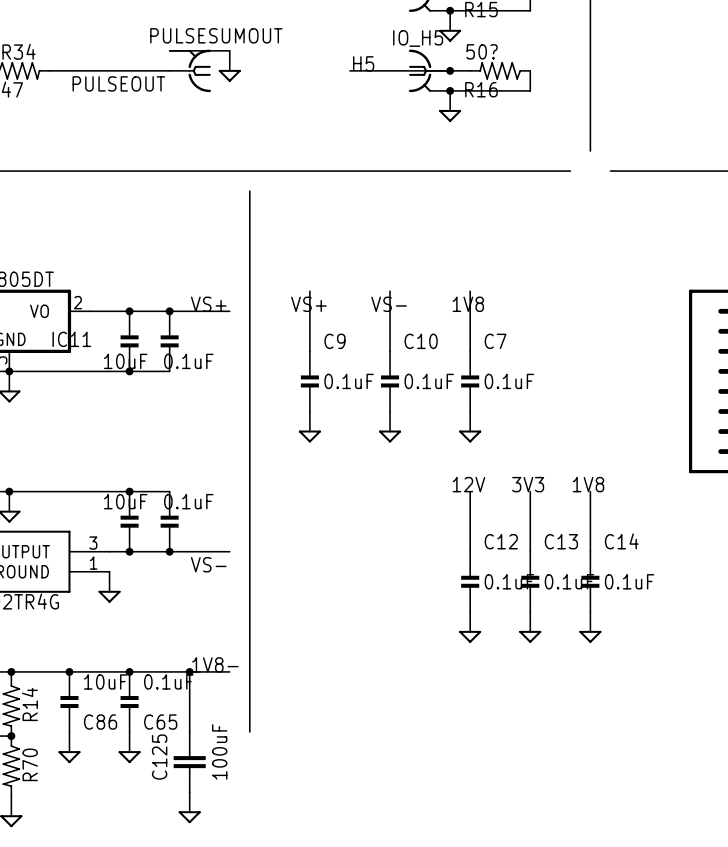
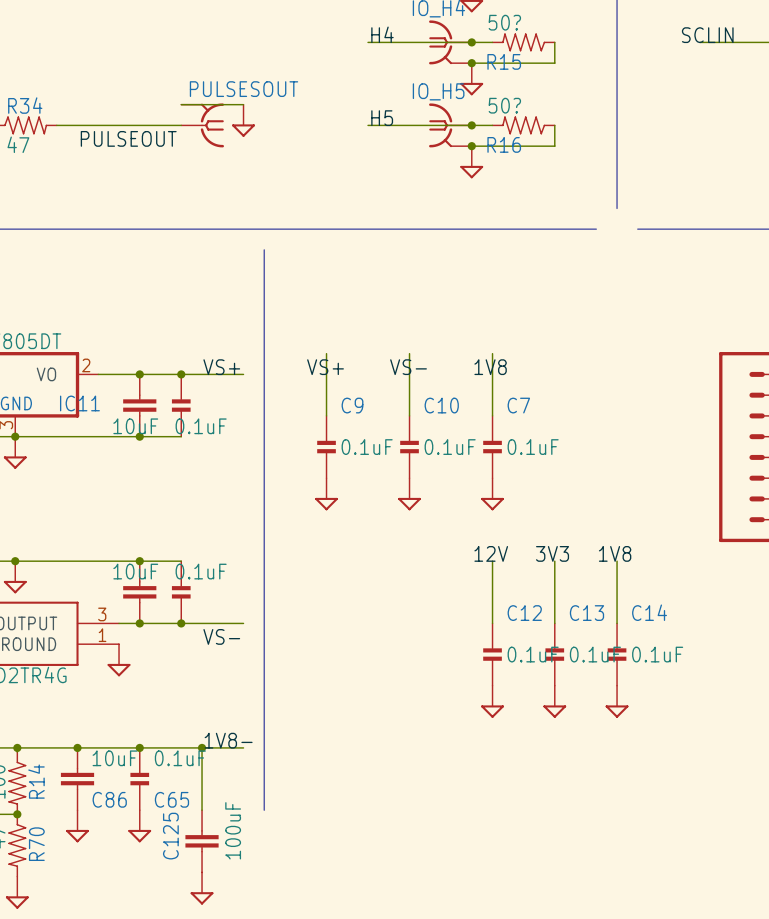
PULSESUMOUT name: PULSESUMOUT (216, 35) -> PULSESOUT (244, 89)
part symbol: [120, 310, 139, 373] -> [123, 374, 157, 437]
part symbol: [120, 491, 139, 553] -> [123, 561, 157, 624]
C86 symbol: [60, 671, 79, 733] -> [60, 747, 95, 811]

